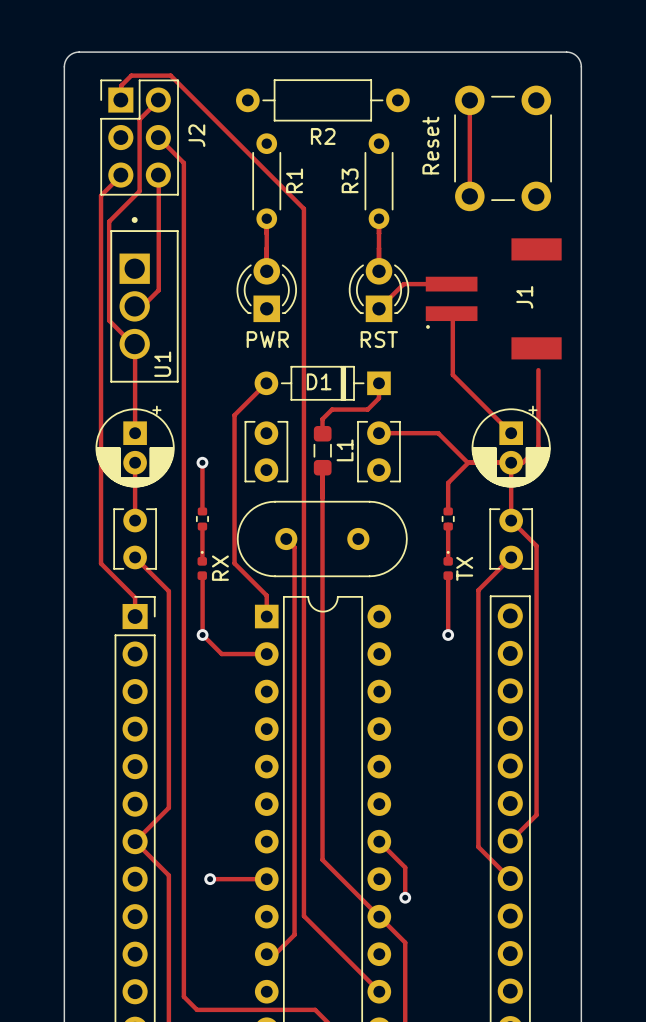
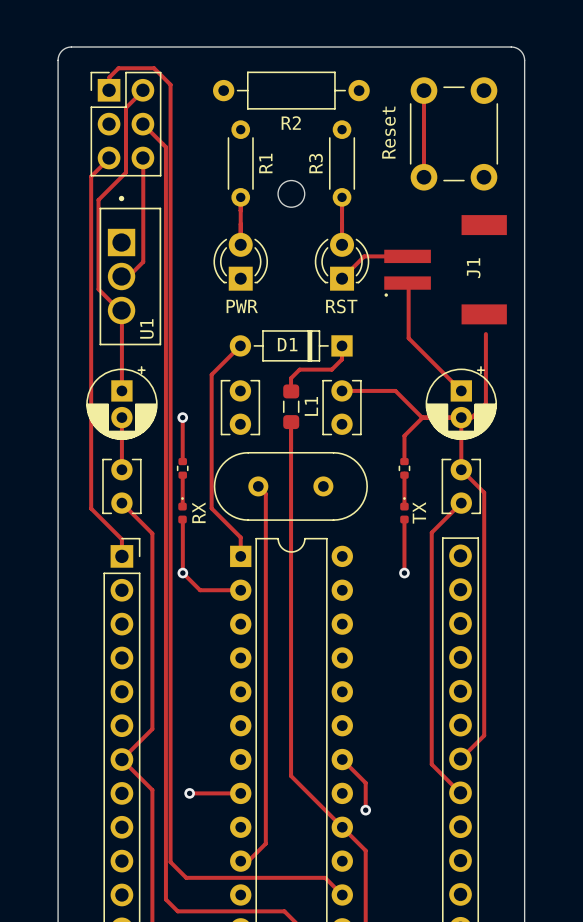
track: (189, 93) (303, 208) (303, 916) (379, 991) -> (170, 84) (170, 862) (186, 877) (325, 877) (342, 894)
J2 name: J2 (196, 135) -> none
round board edge: none -> [277, 179, 306, 208]

